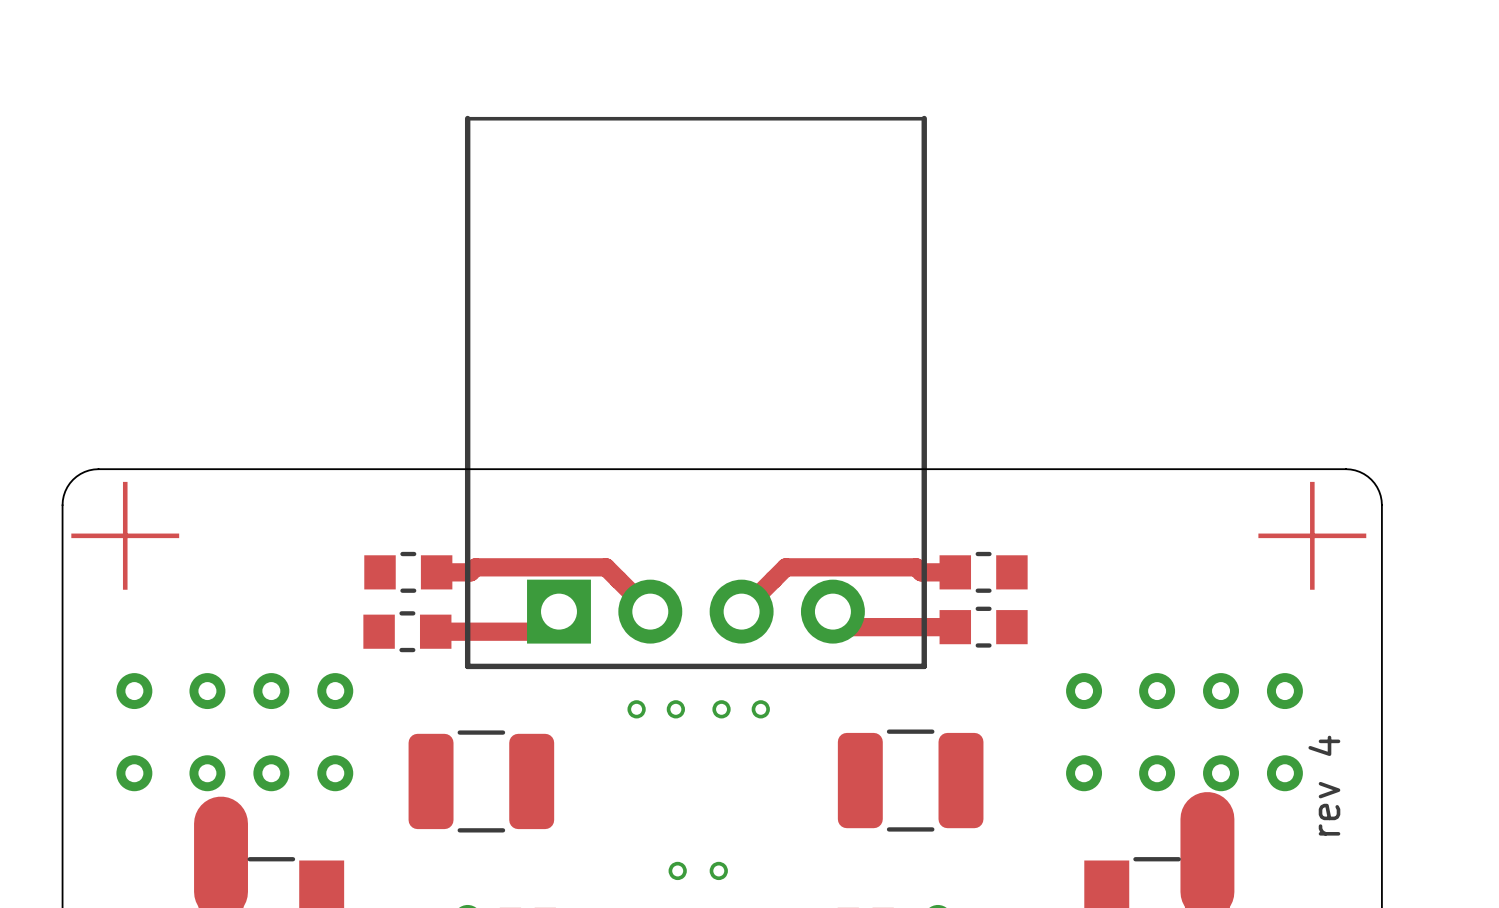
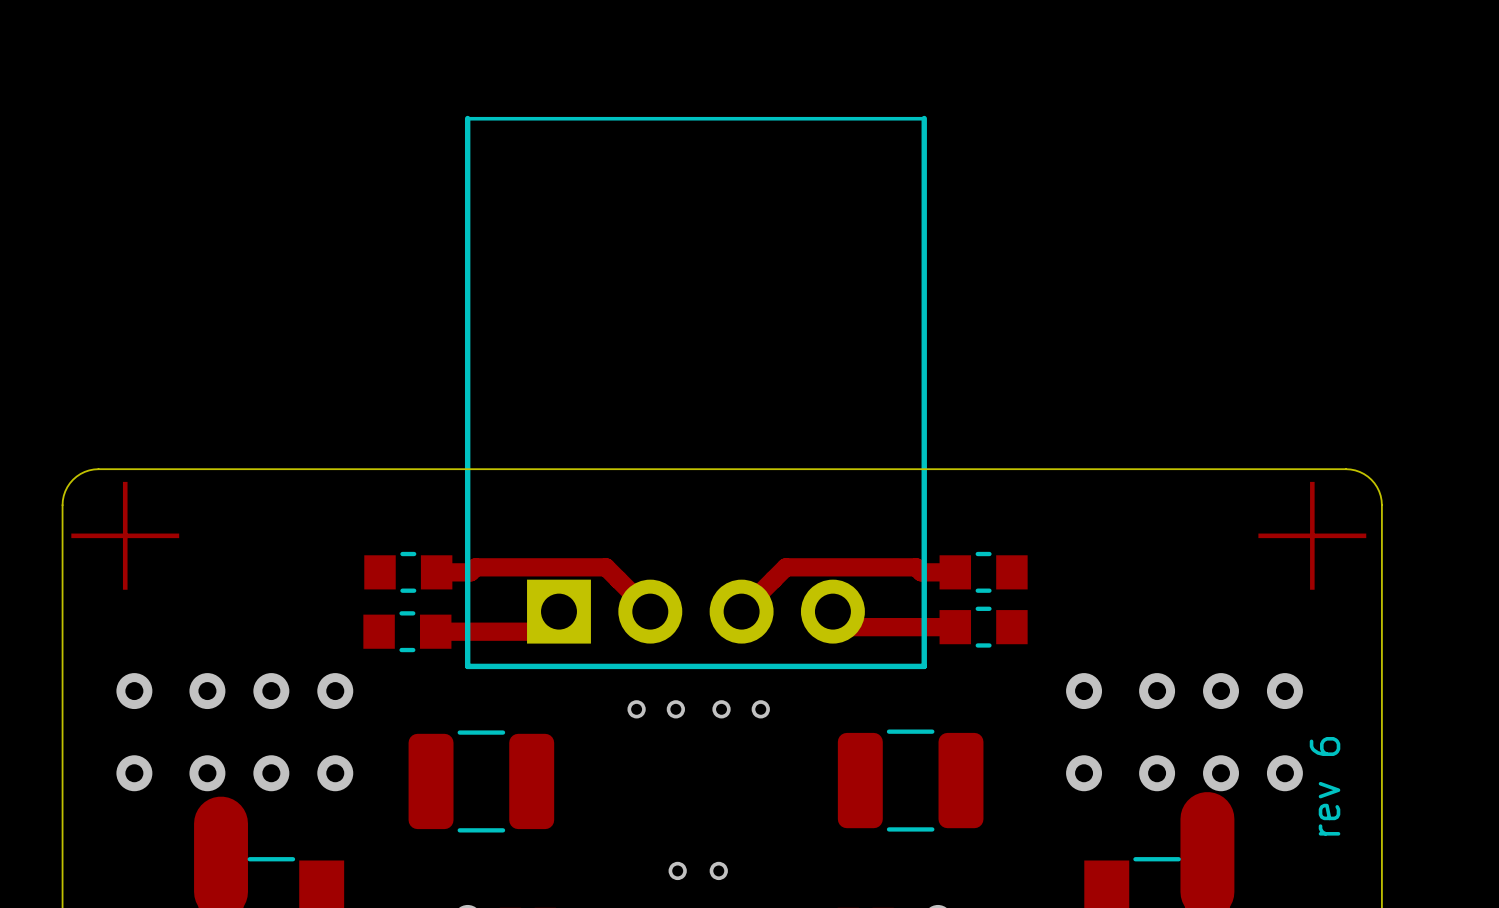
text: rev 4 (1324, 785) -> rev 6 (1325, 786)

